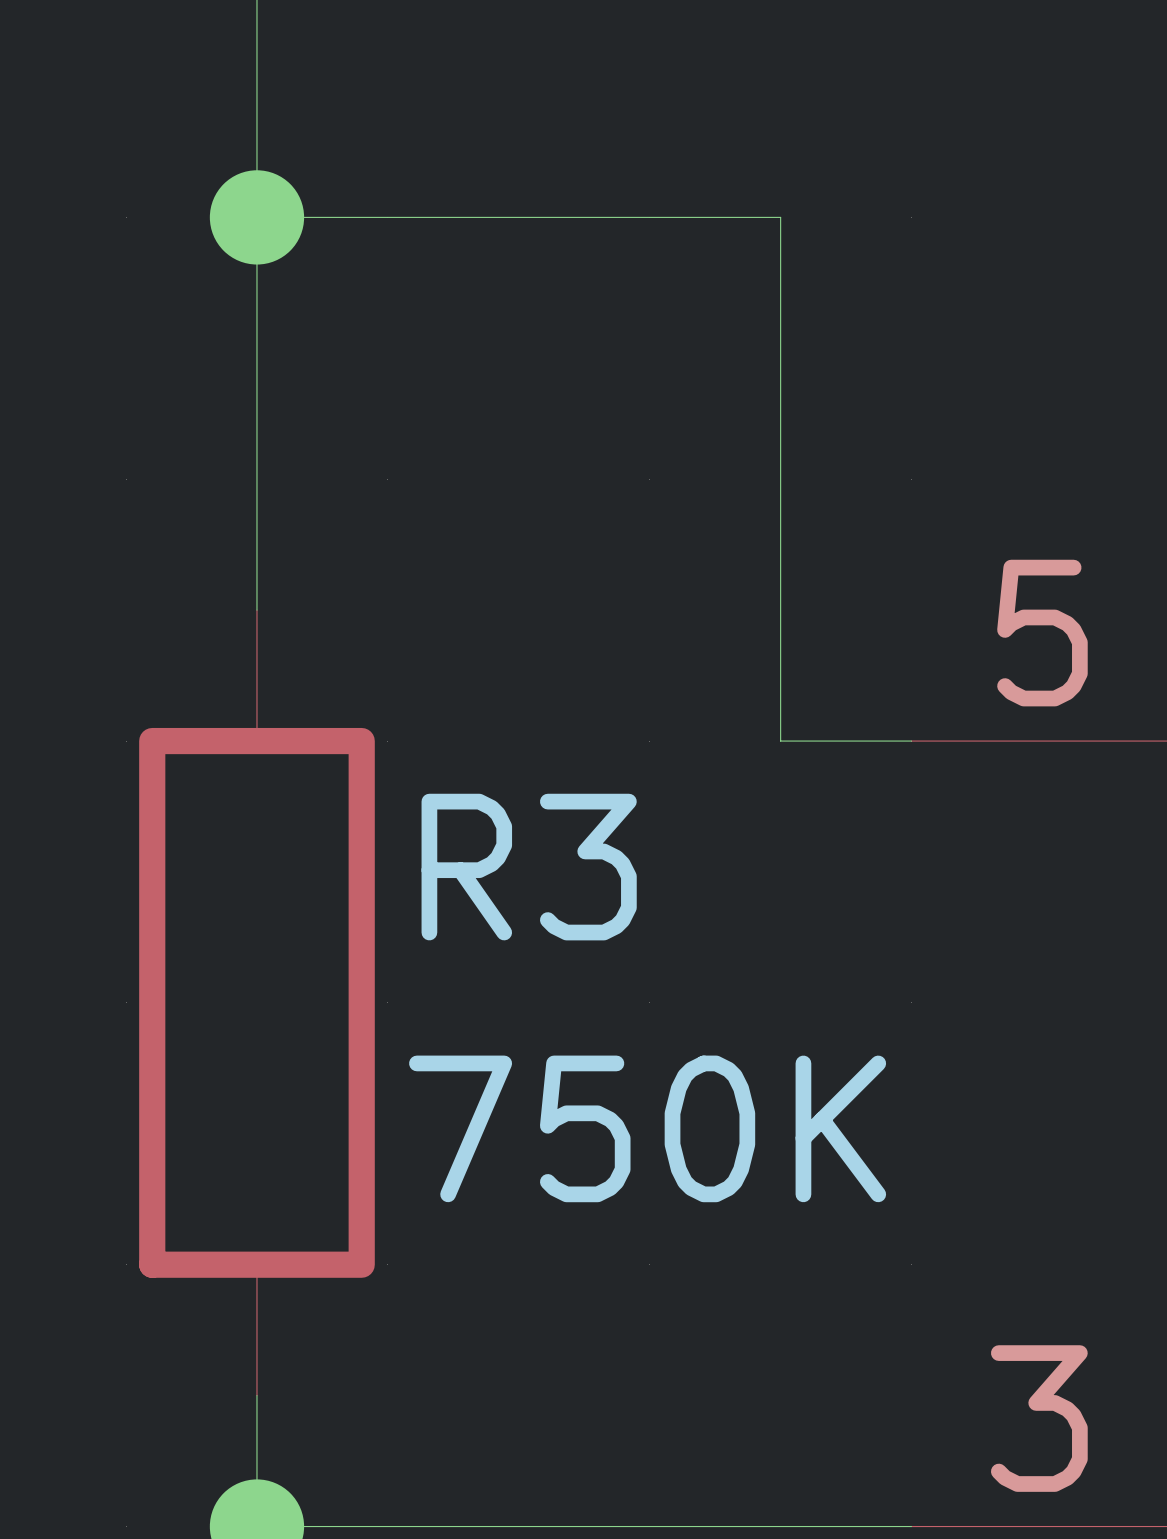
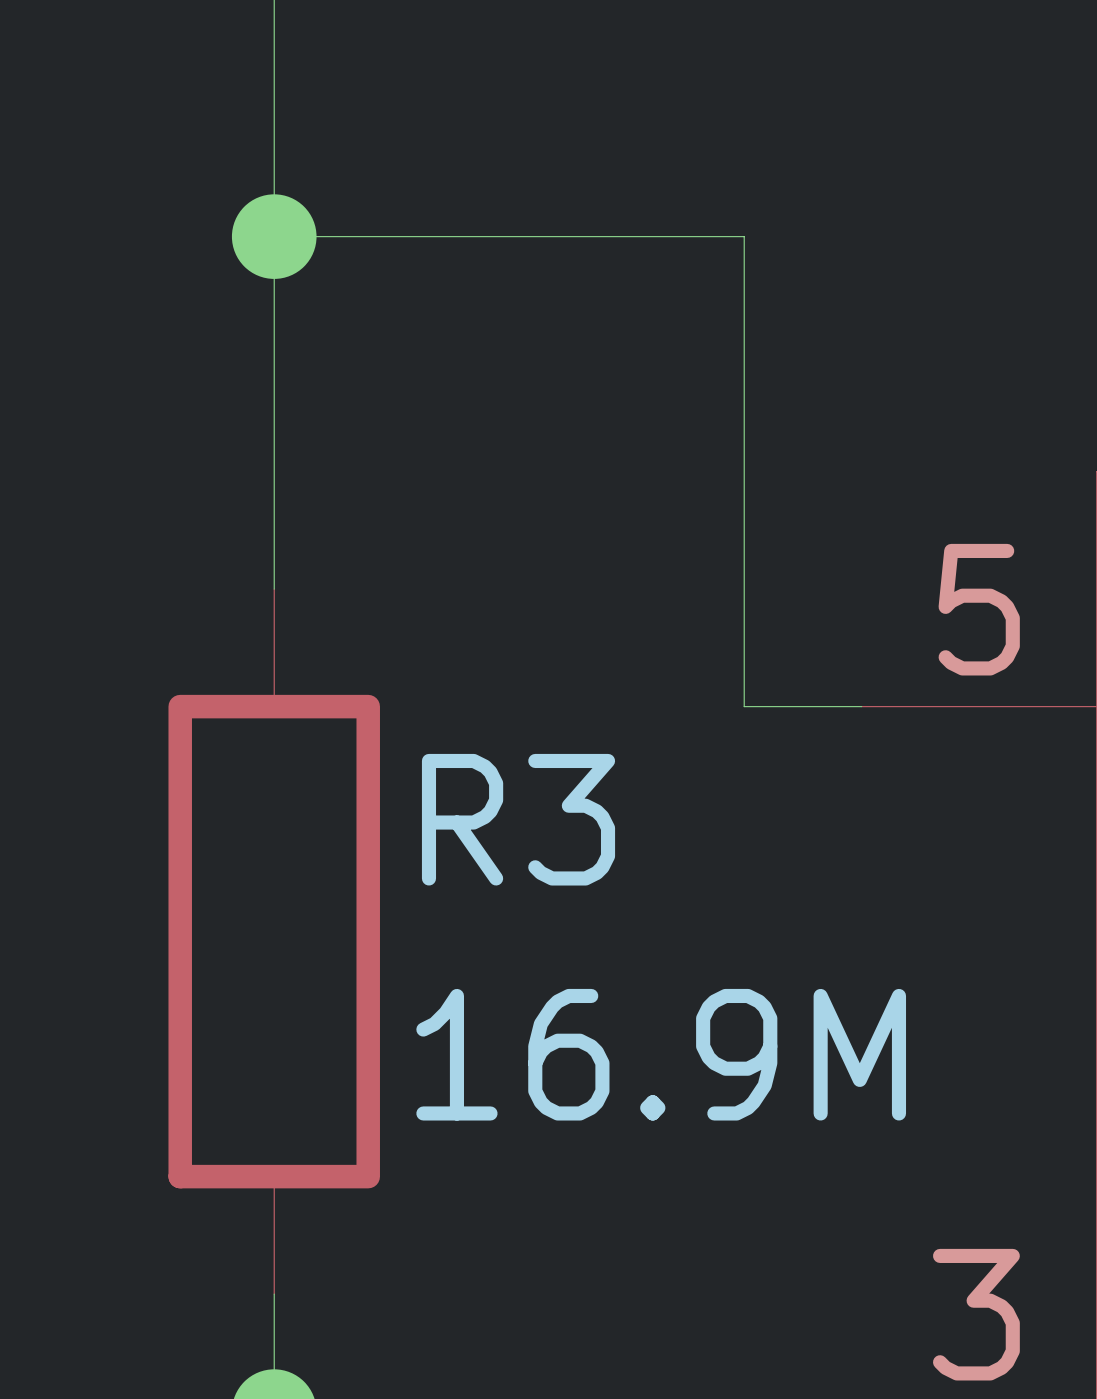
R3 value: 750K (647, 1128) -> 16.9M (661, 1054)

